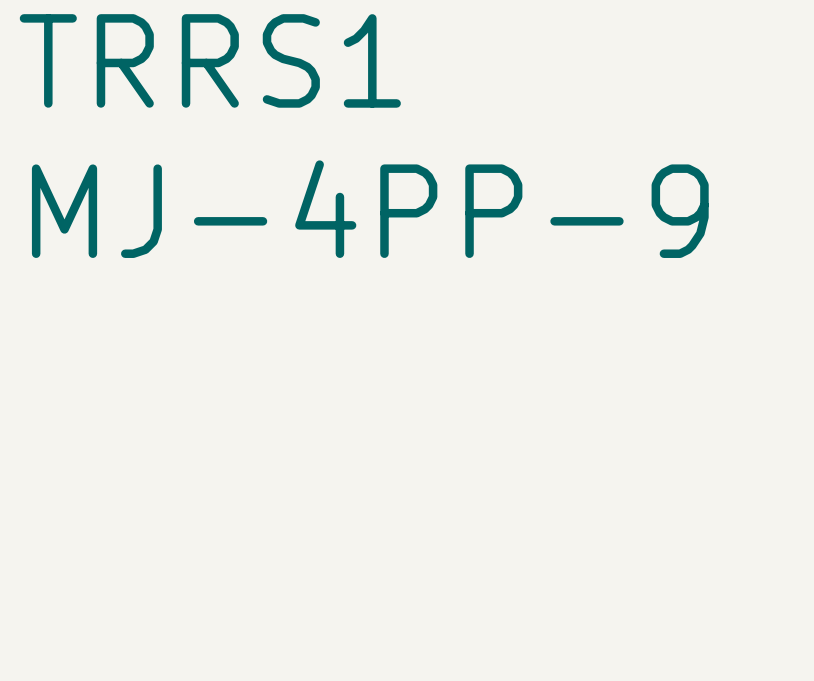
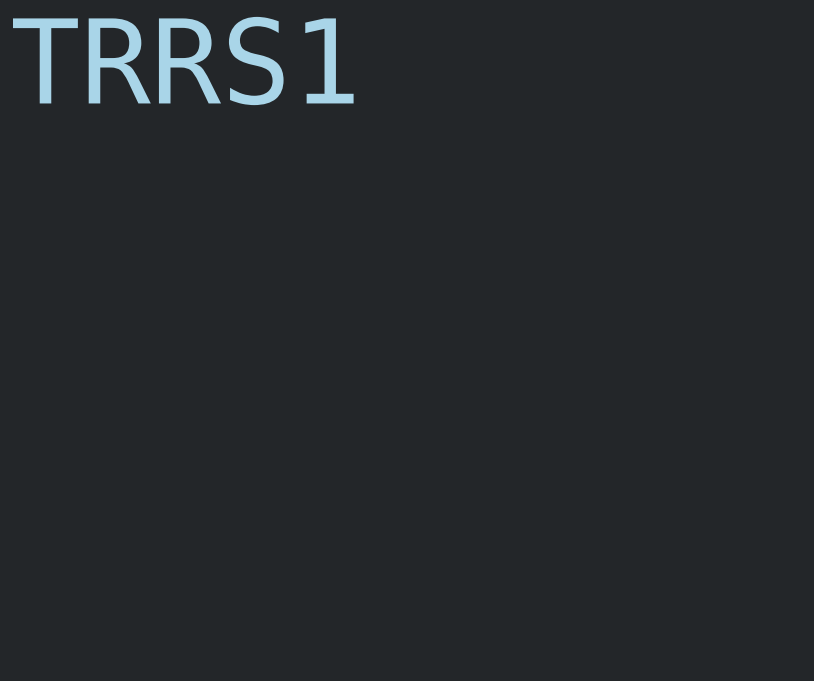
TRRS1 value: MJ-4PP-9 (370, 209) -> none

